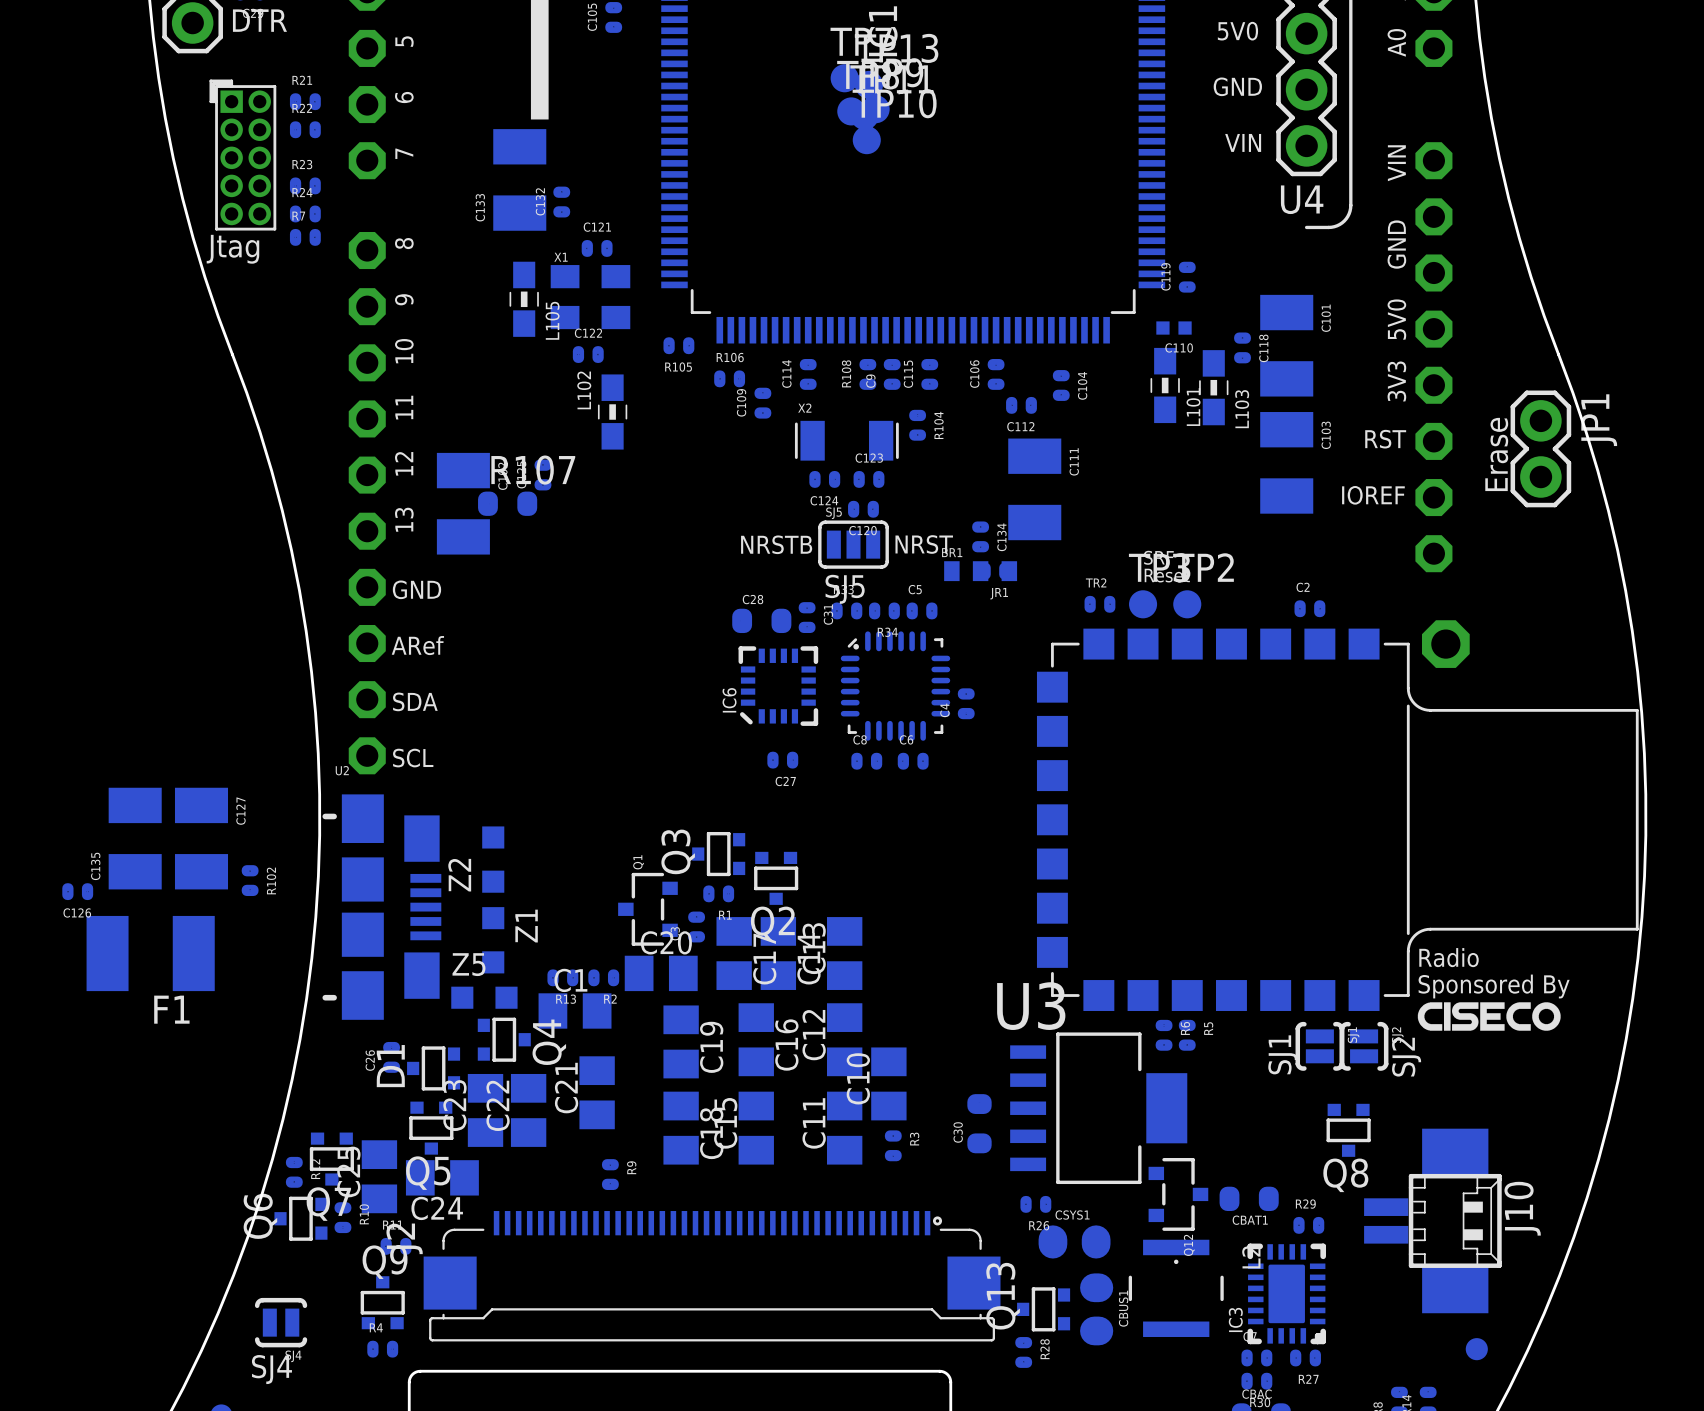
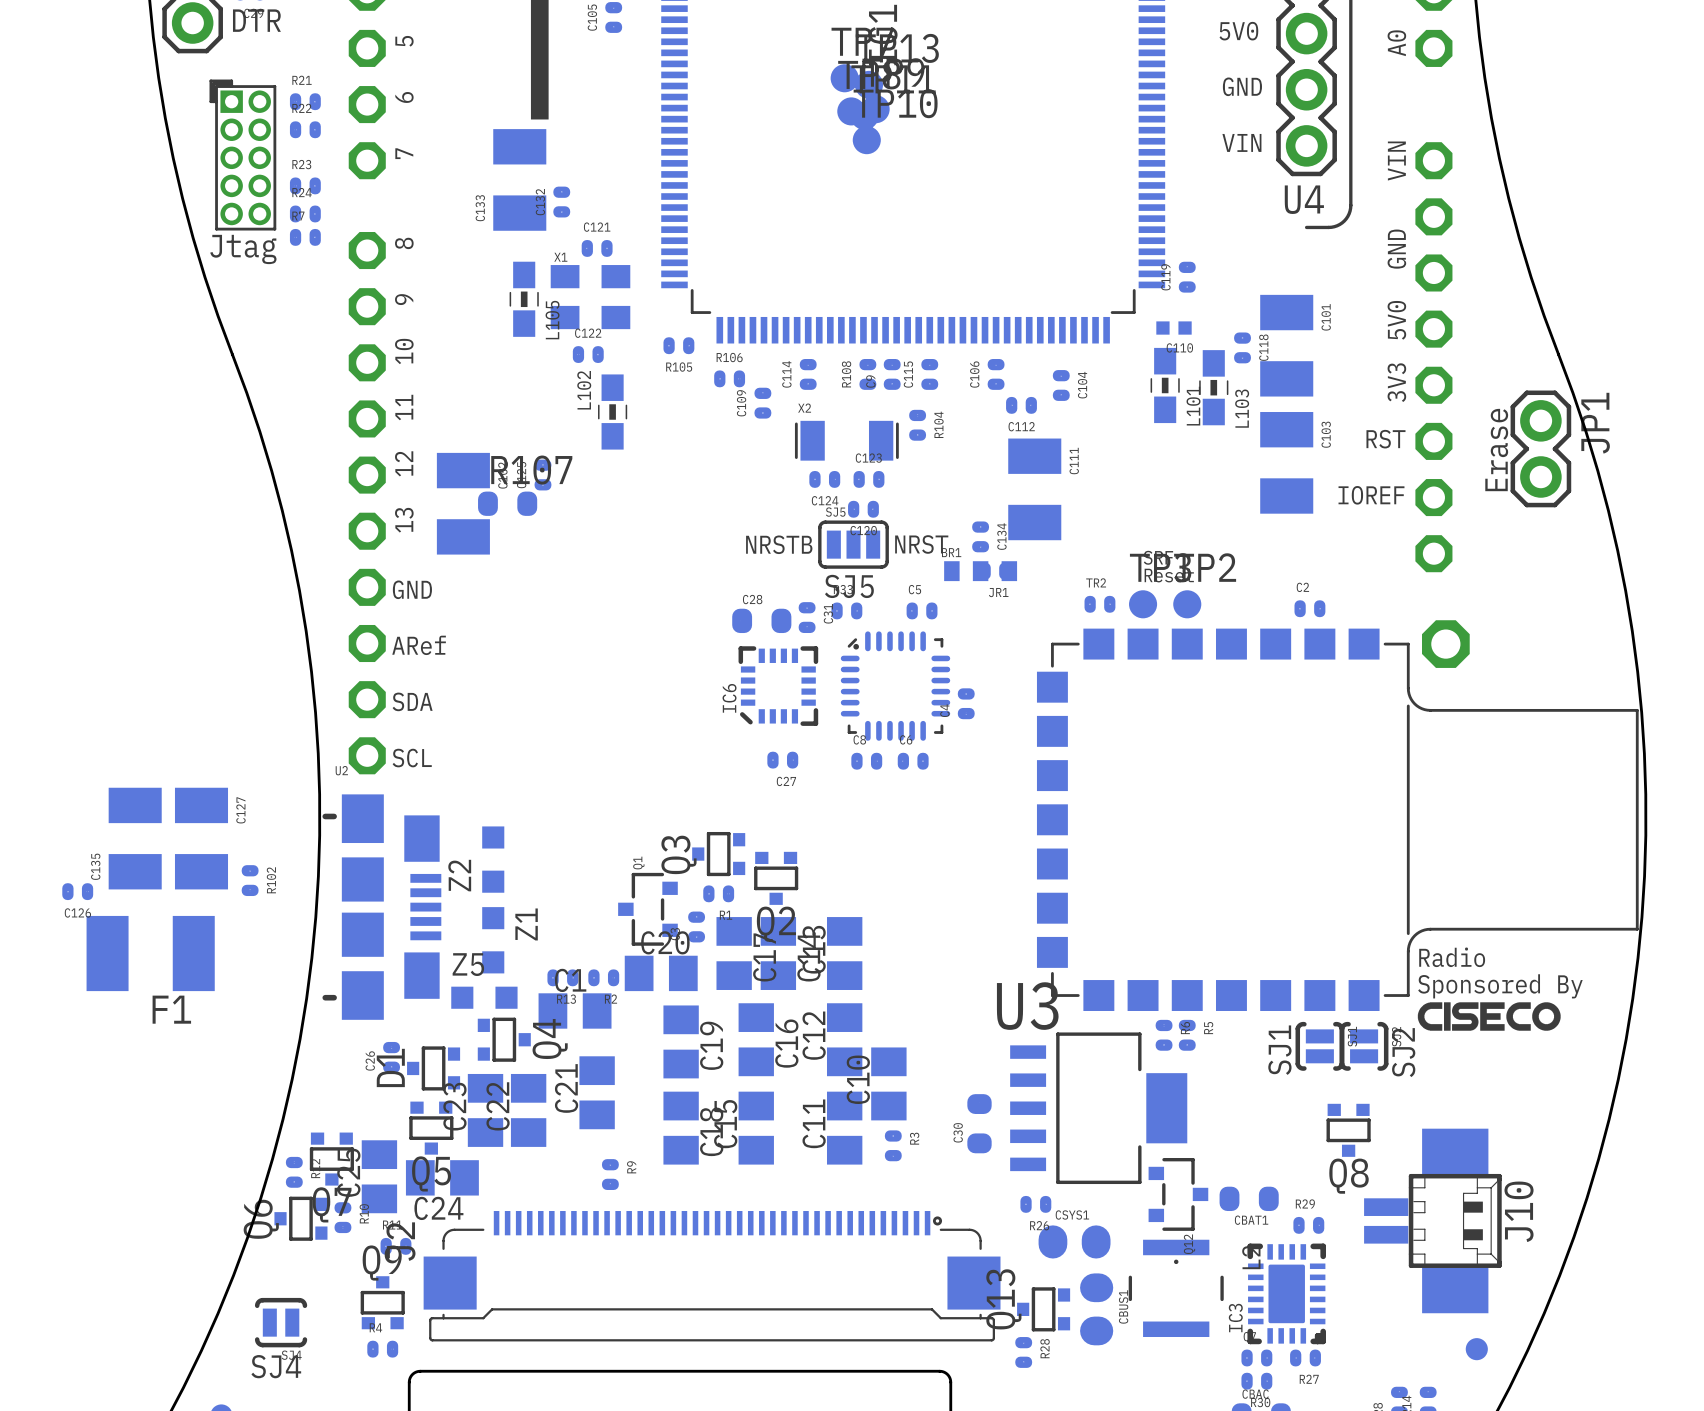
R34: (884, 610) -> none

